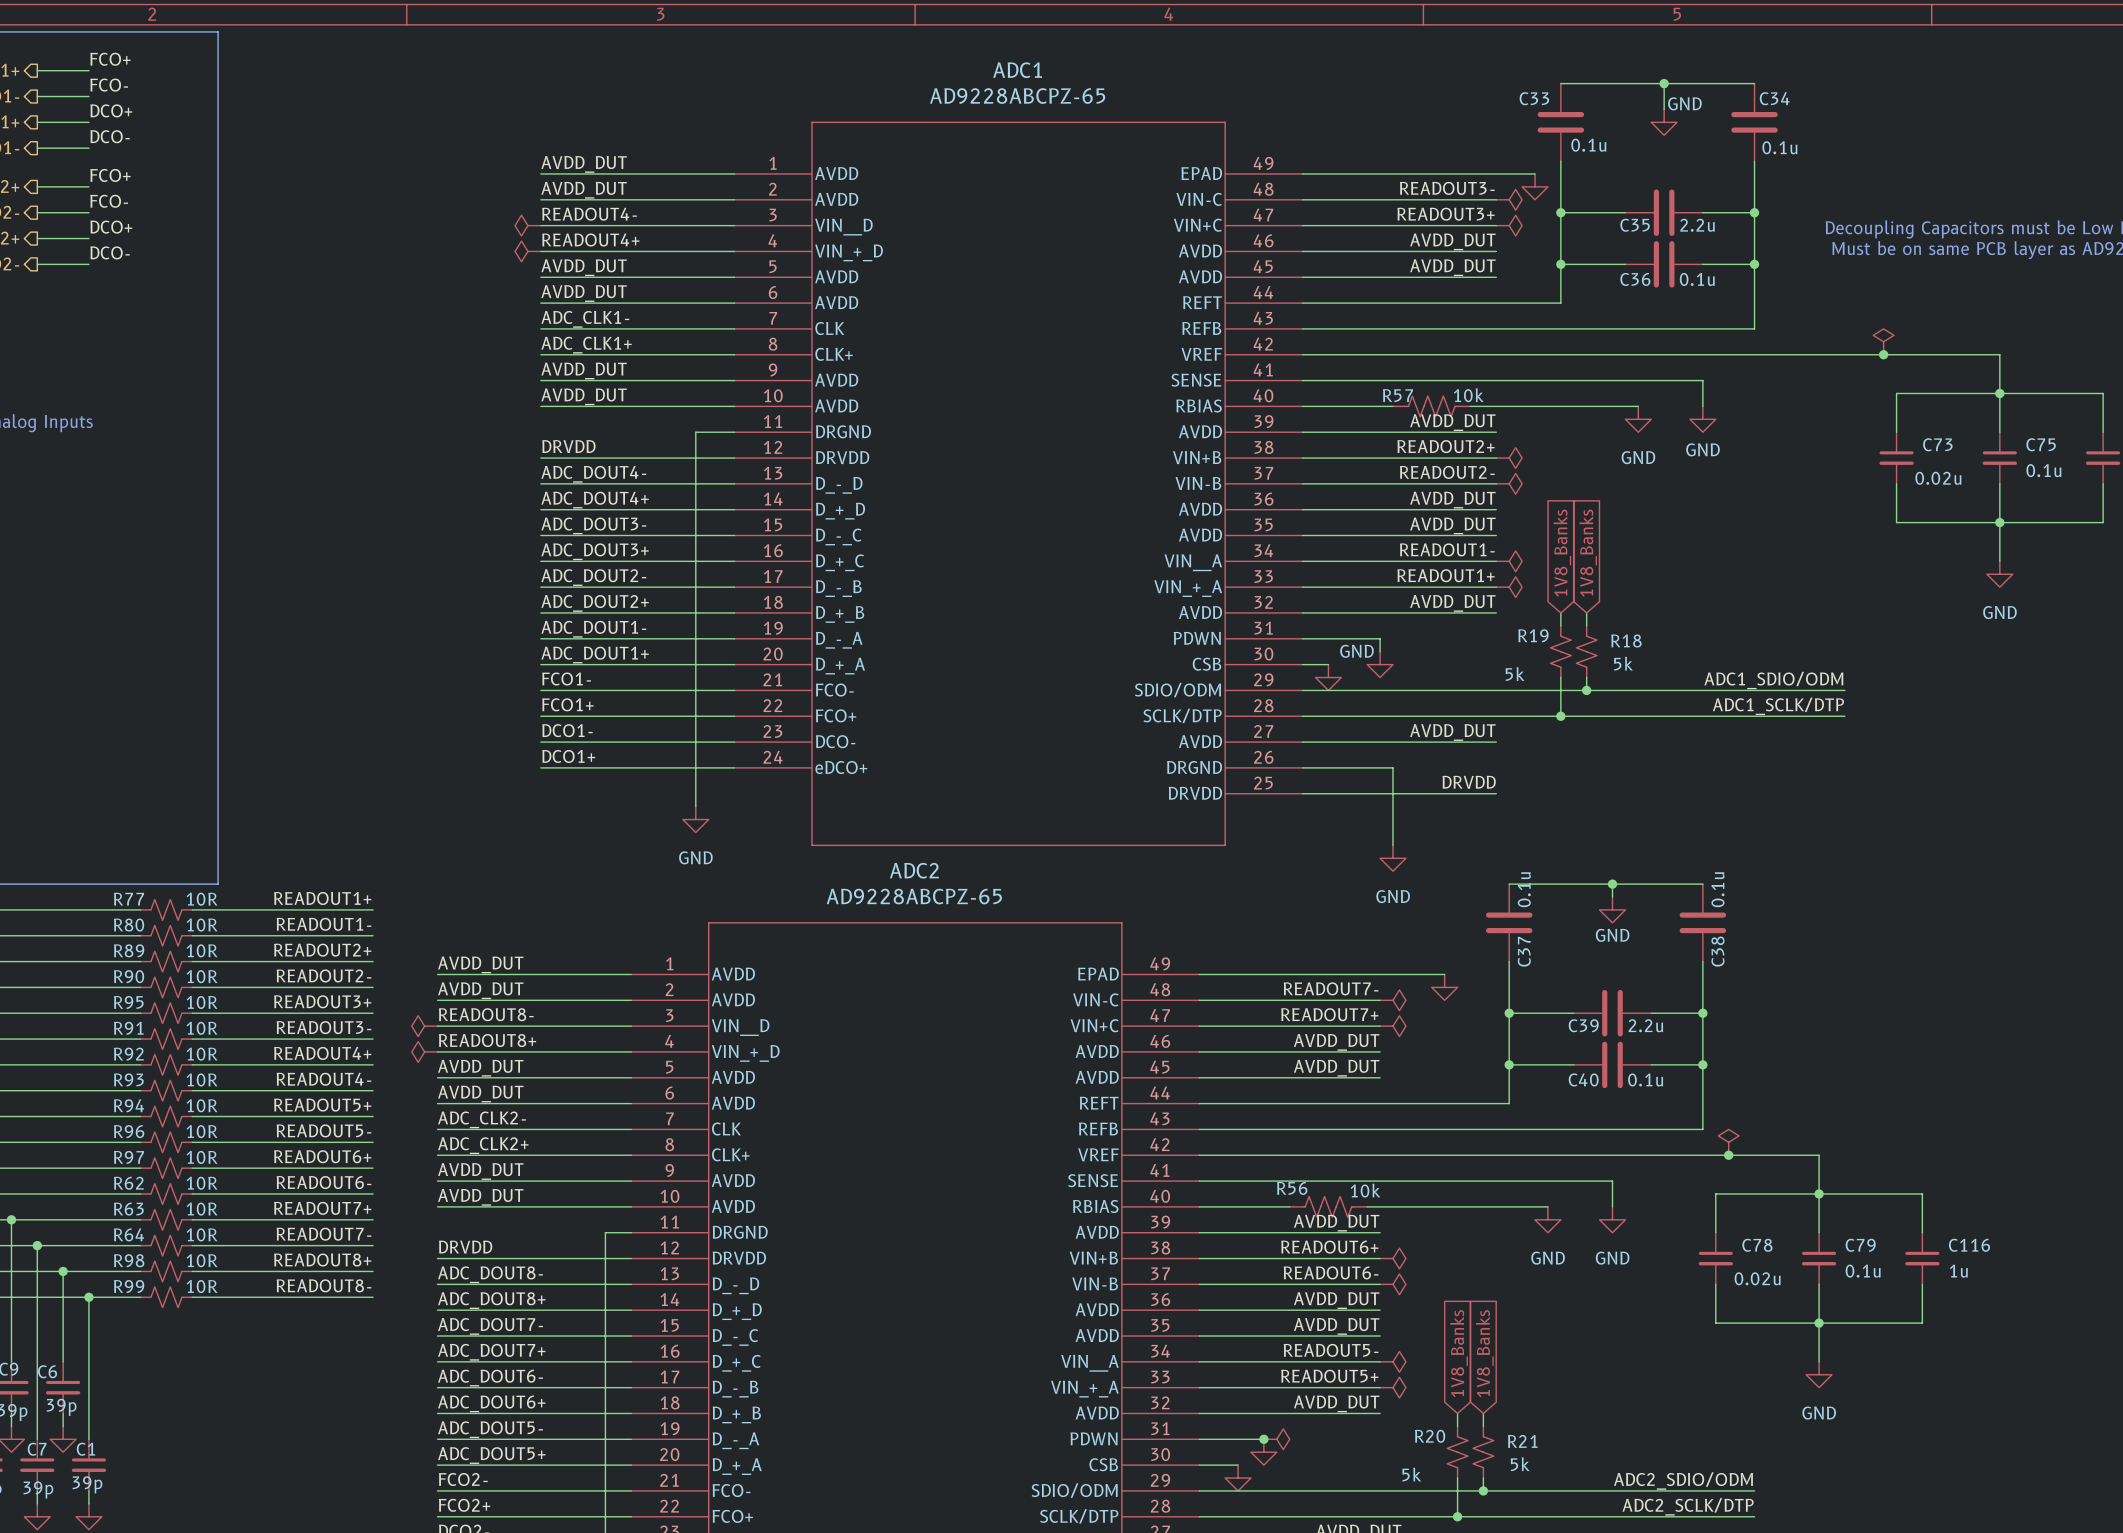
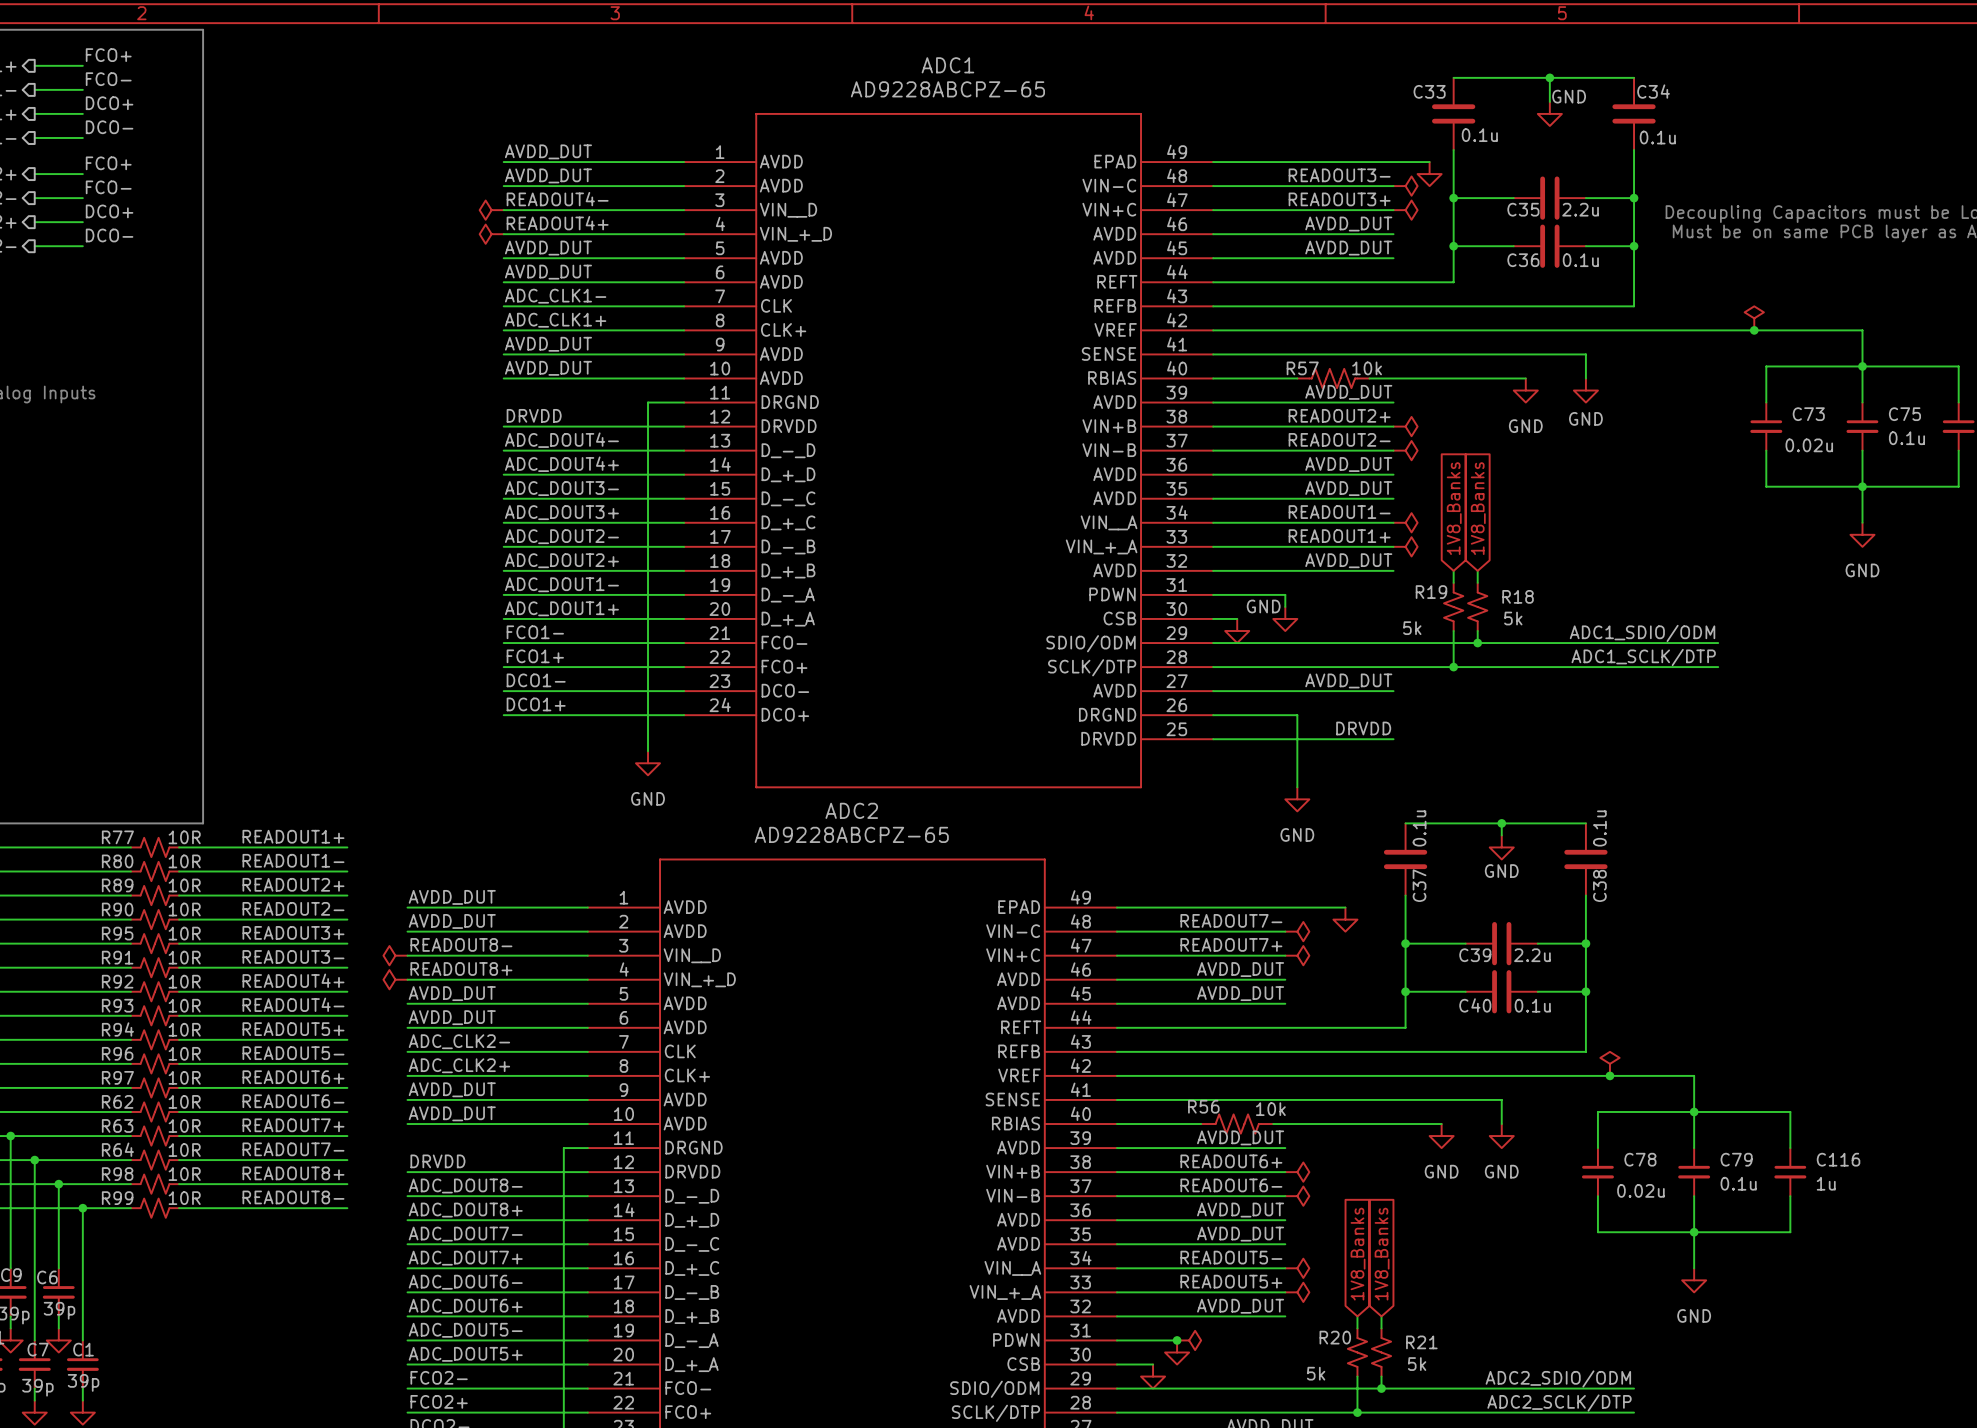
ADC1 pin name: eDCO+ (841, 767) -> DCO+ (785, 714)

